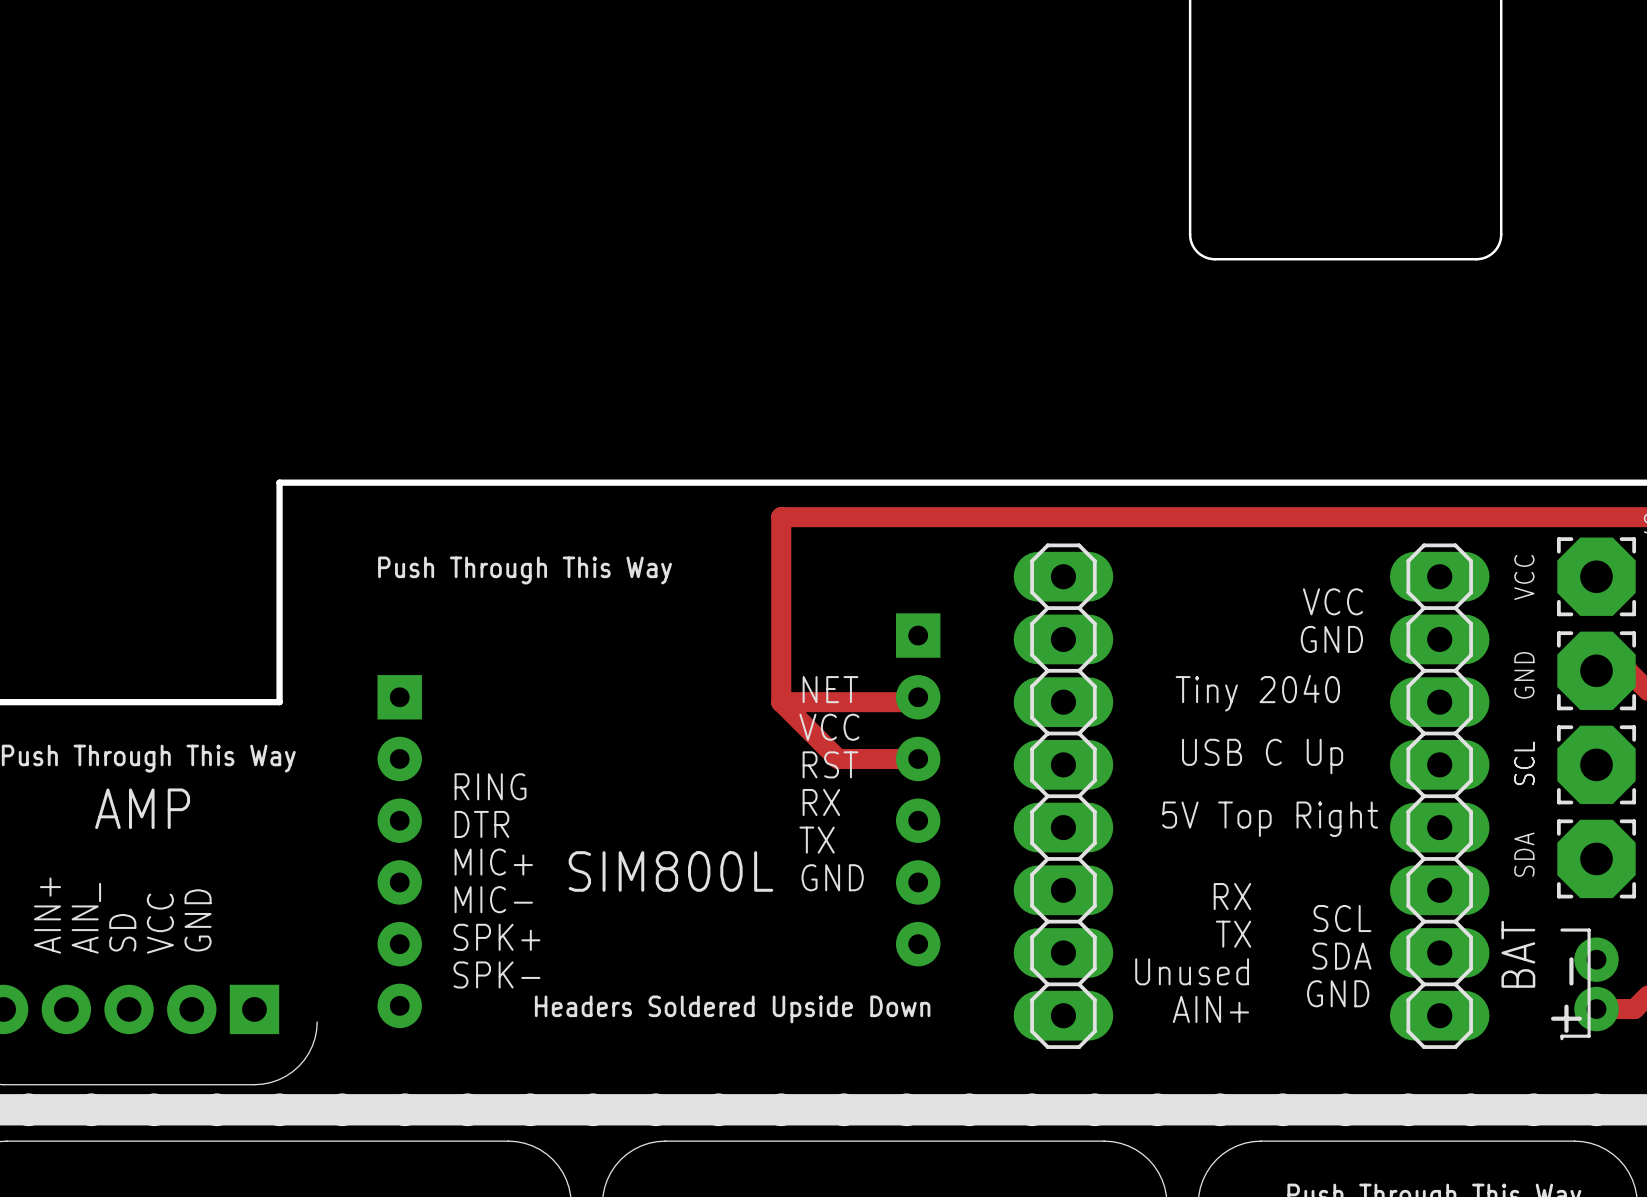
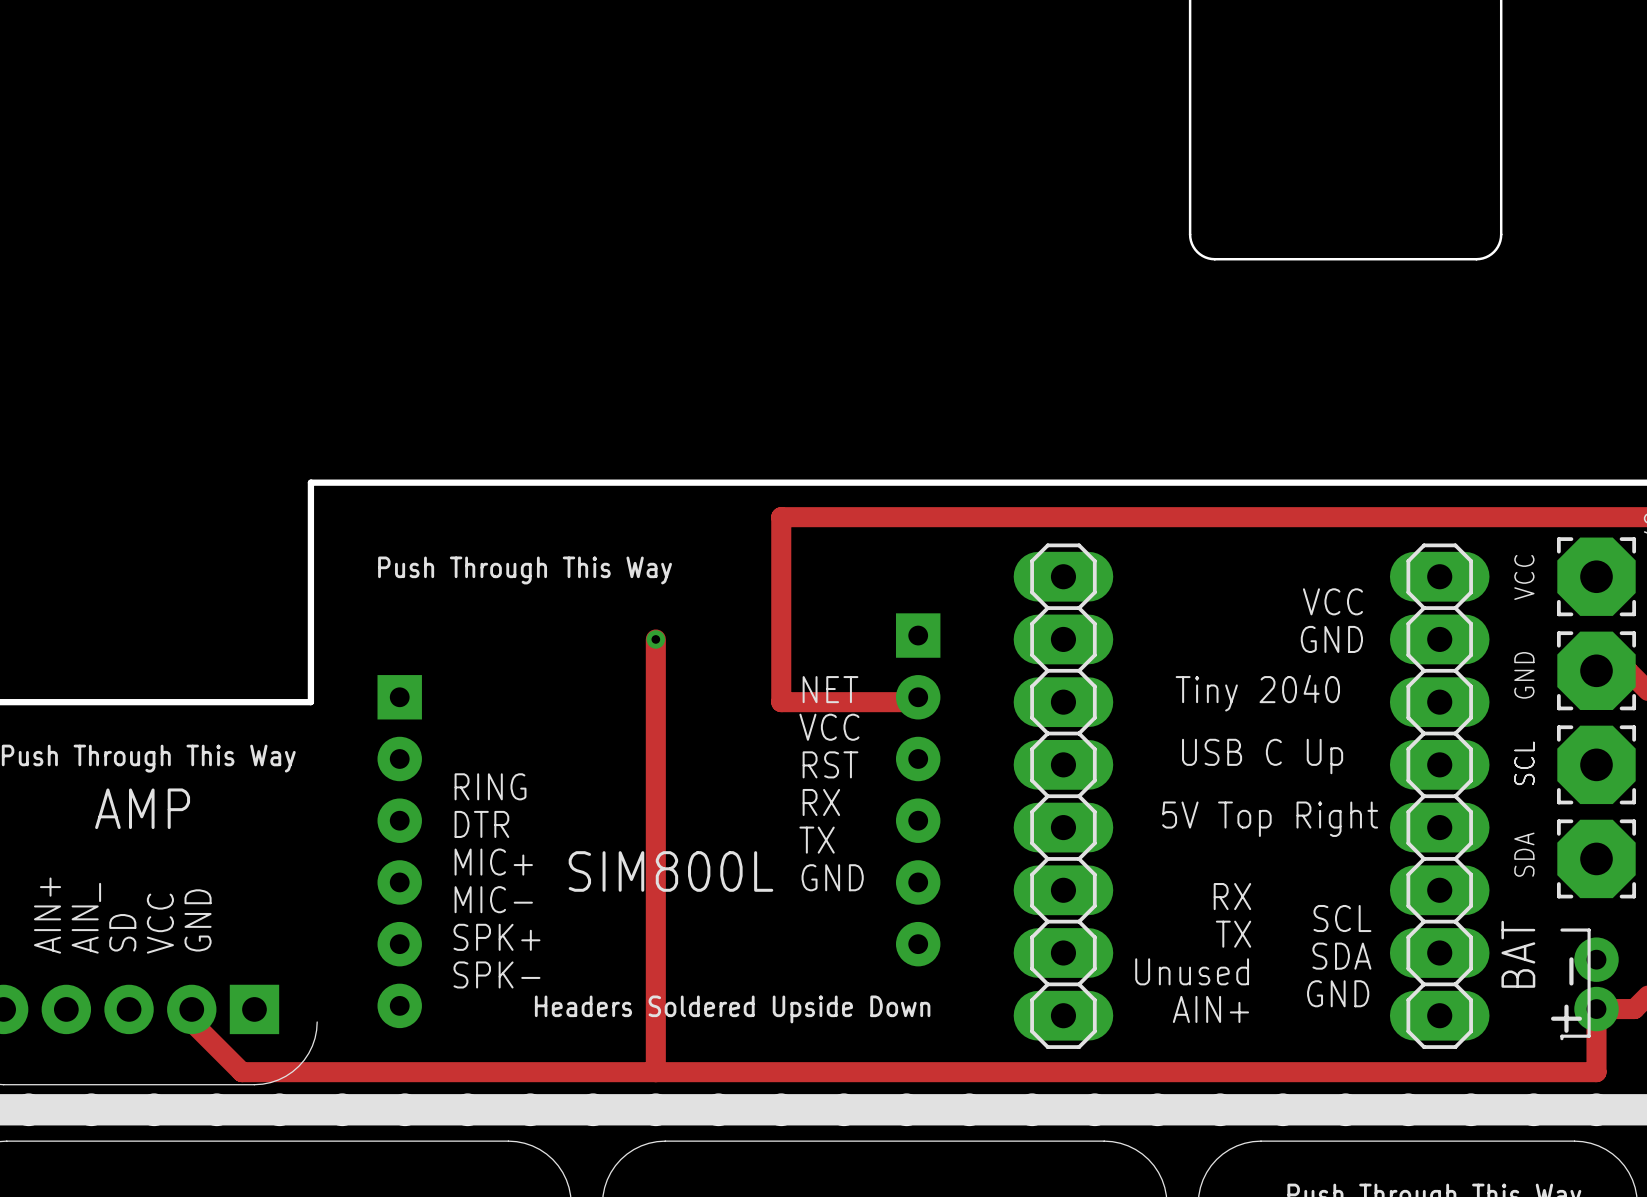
board edge: (310, 482) (279, 482) (279, 702) -> (310, 482) (310, 702) (279, 702)
track: none -> (655, 639) (655, 1072)
via: none -> (655, 639)
track: (781, 702) (838, 758) (918, 758) -> none
track: none -> (1596, 1009) (1596, 1072) (241, 1072) (191, 1021) (191, 1009)

